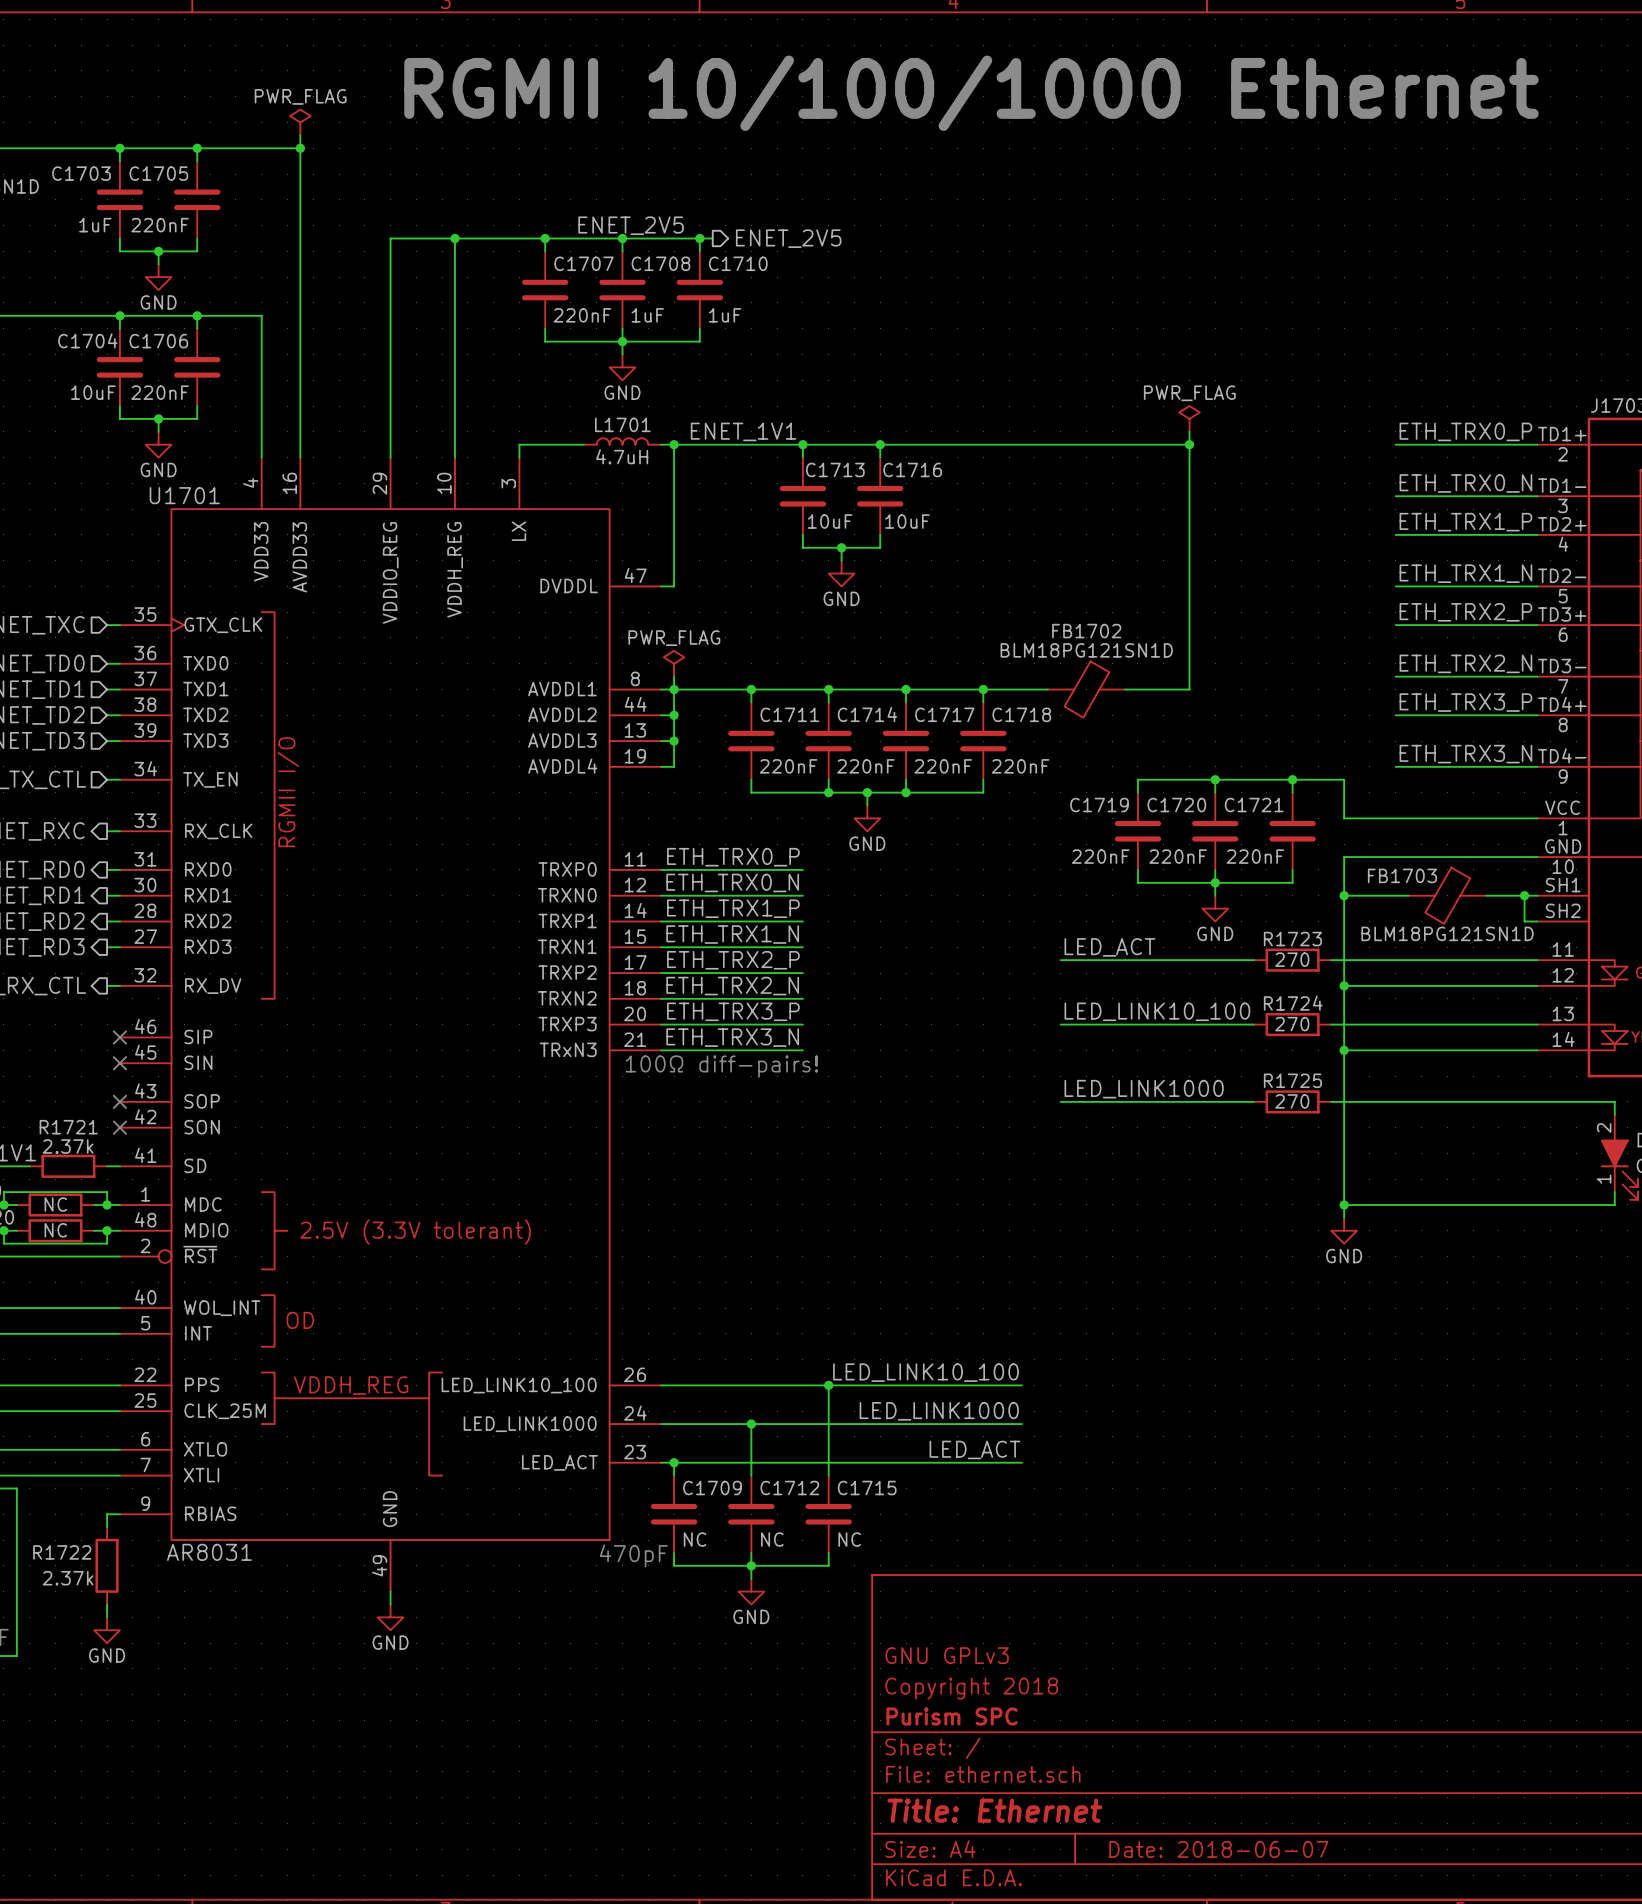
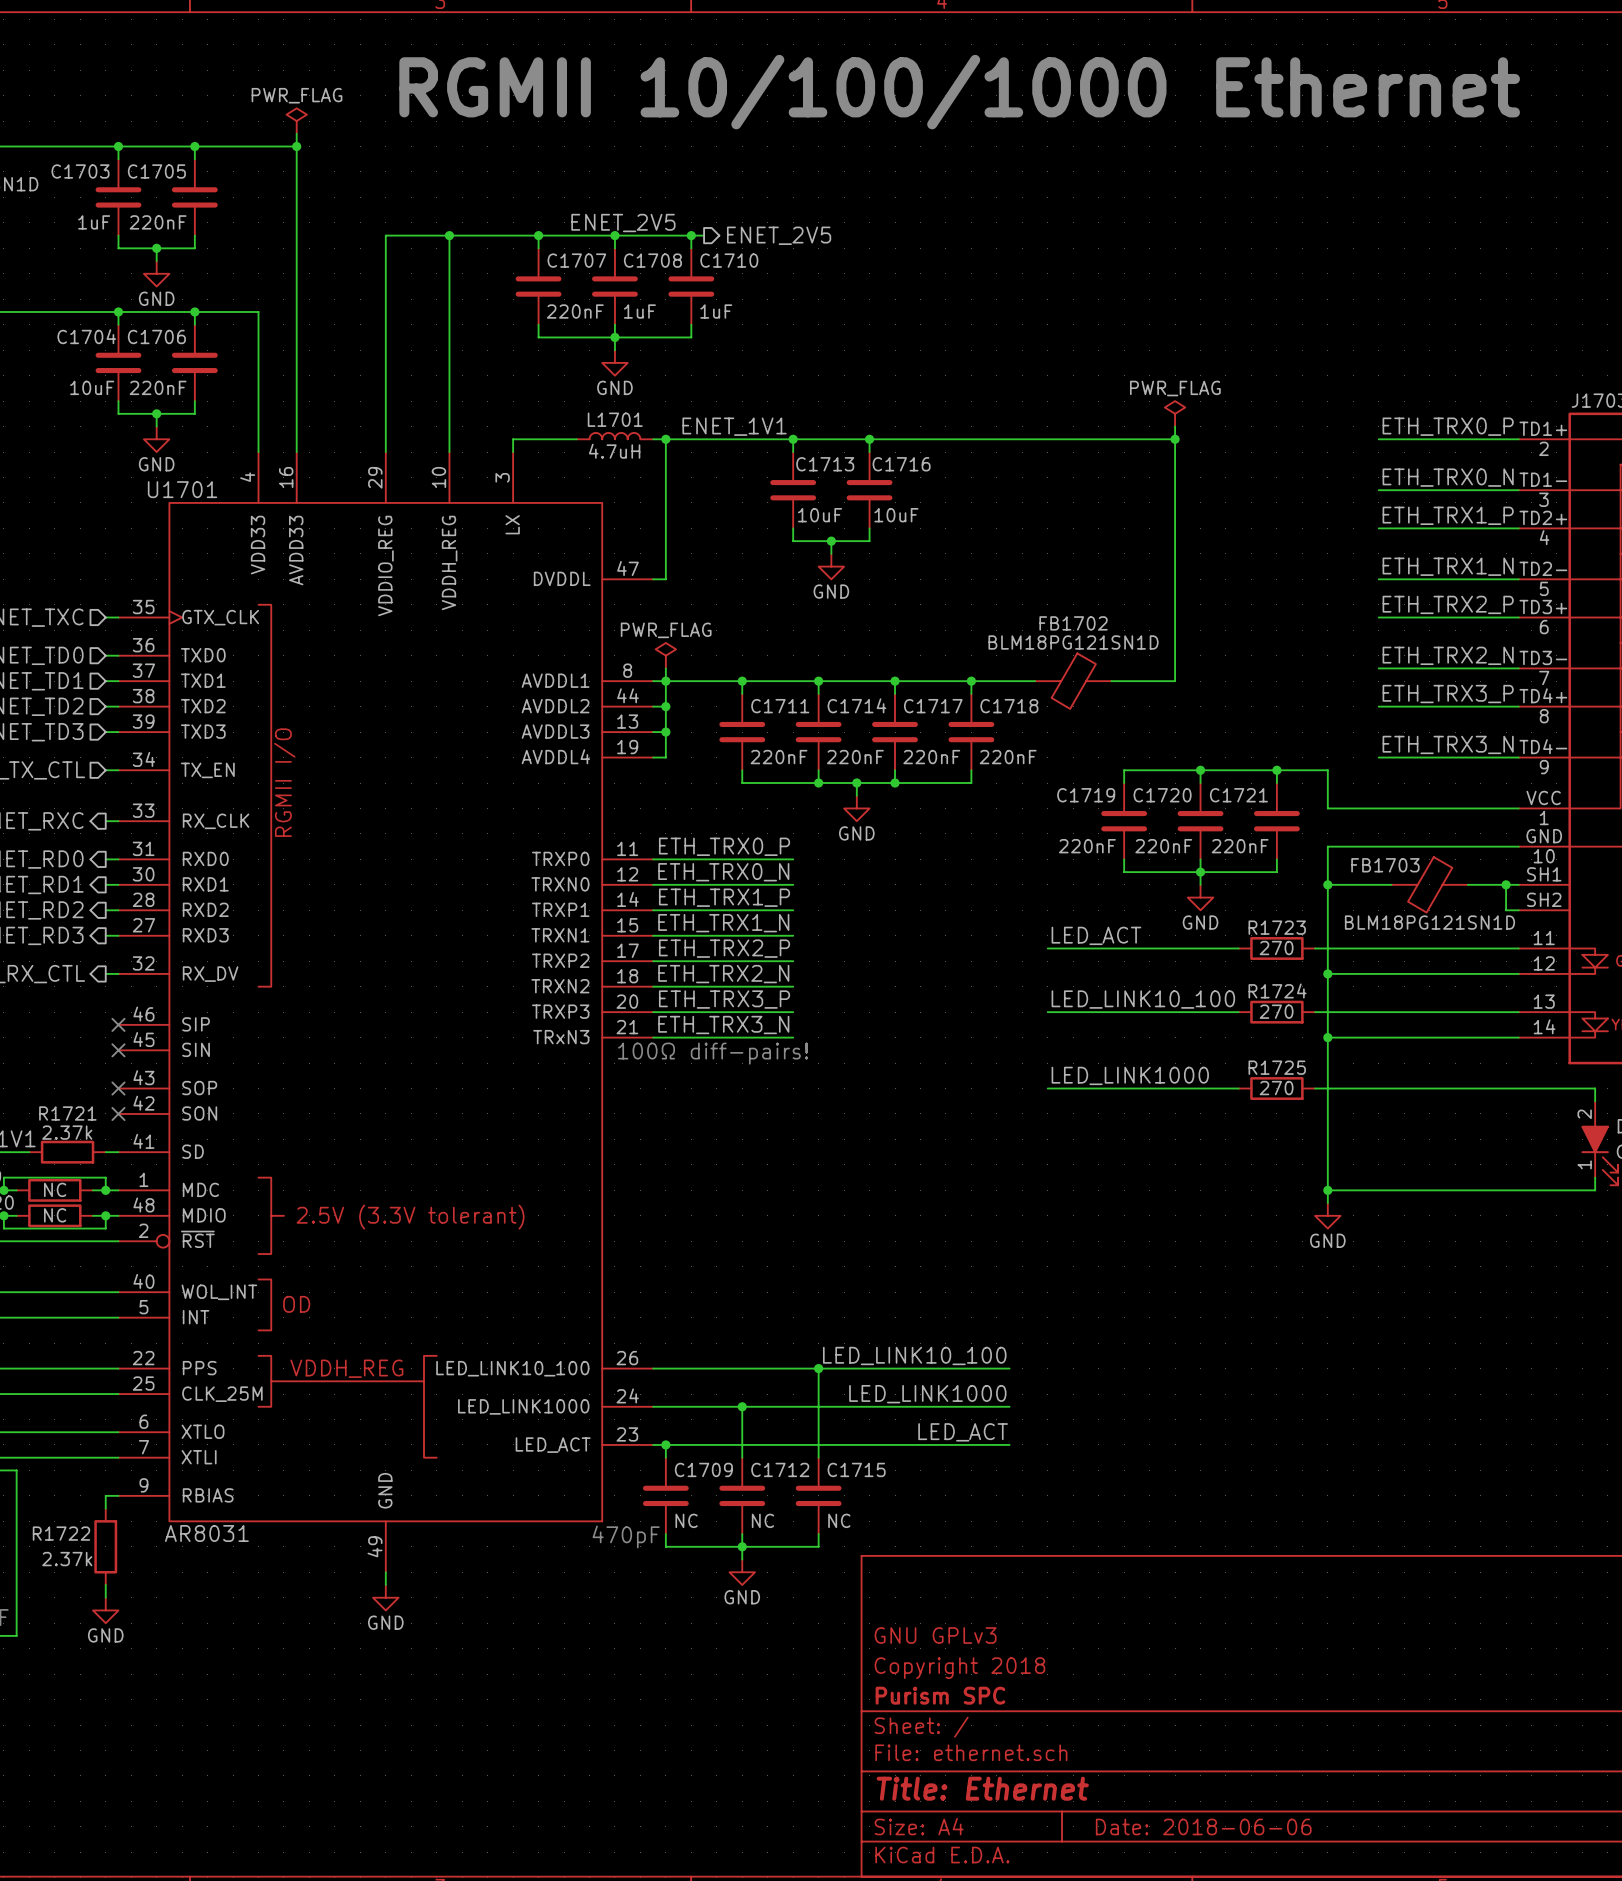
title block: Date: 2018-06-07 (1218, 1849) -> Date: 2018-06-06 (1203, 1826)

